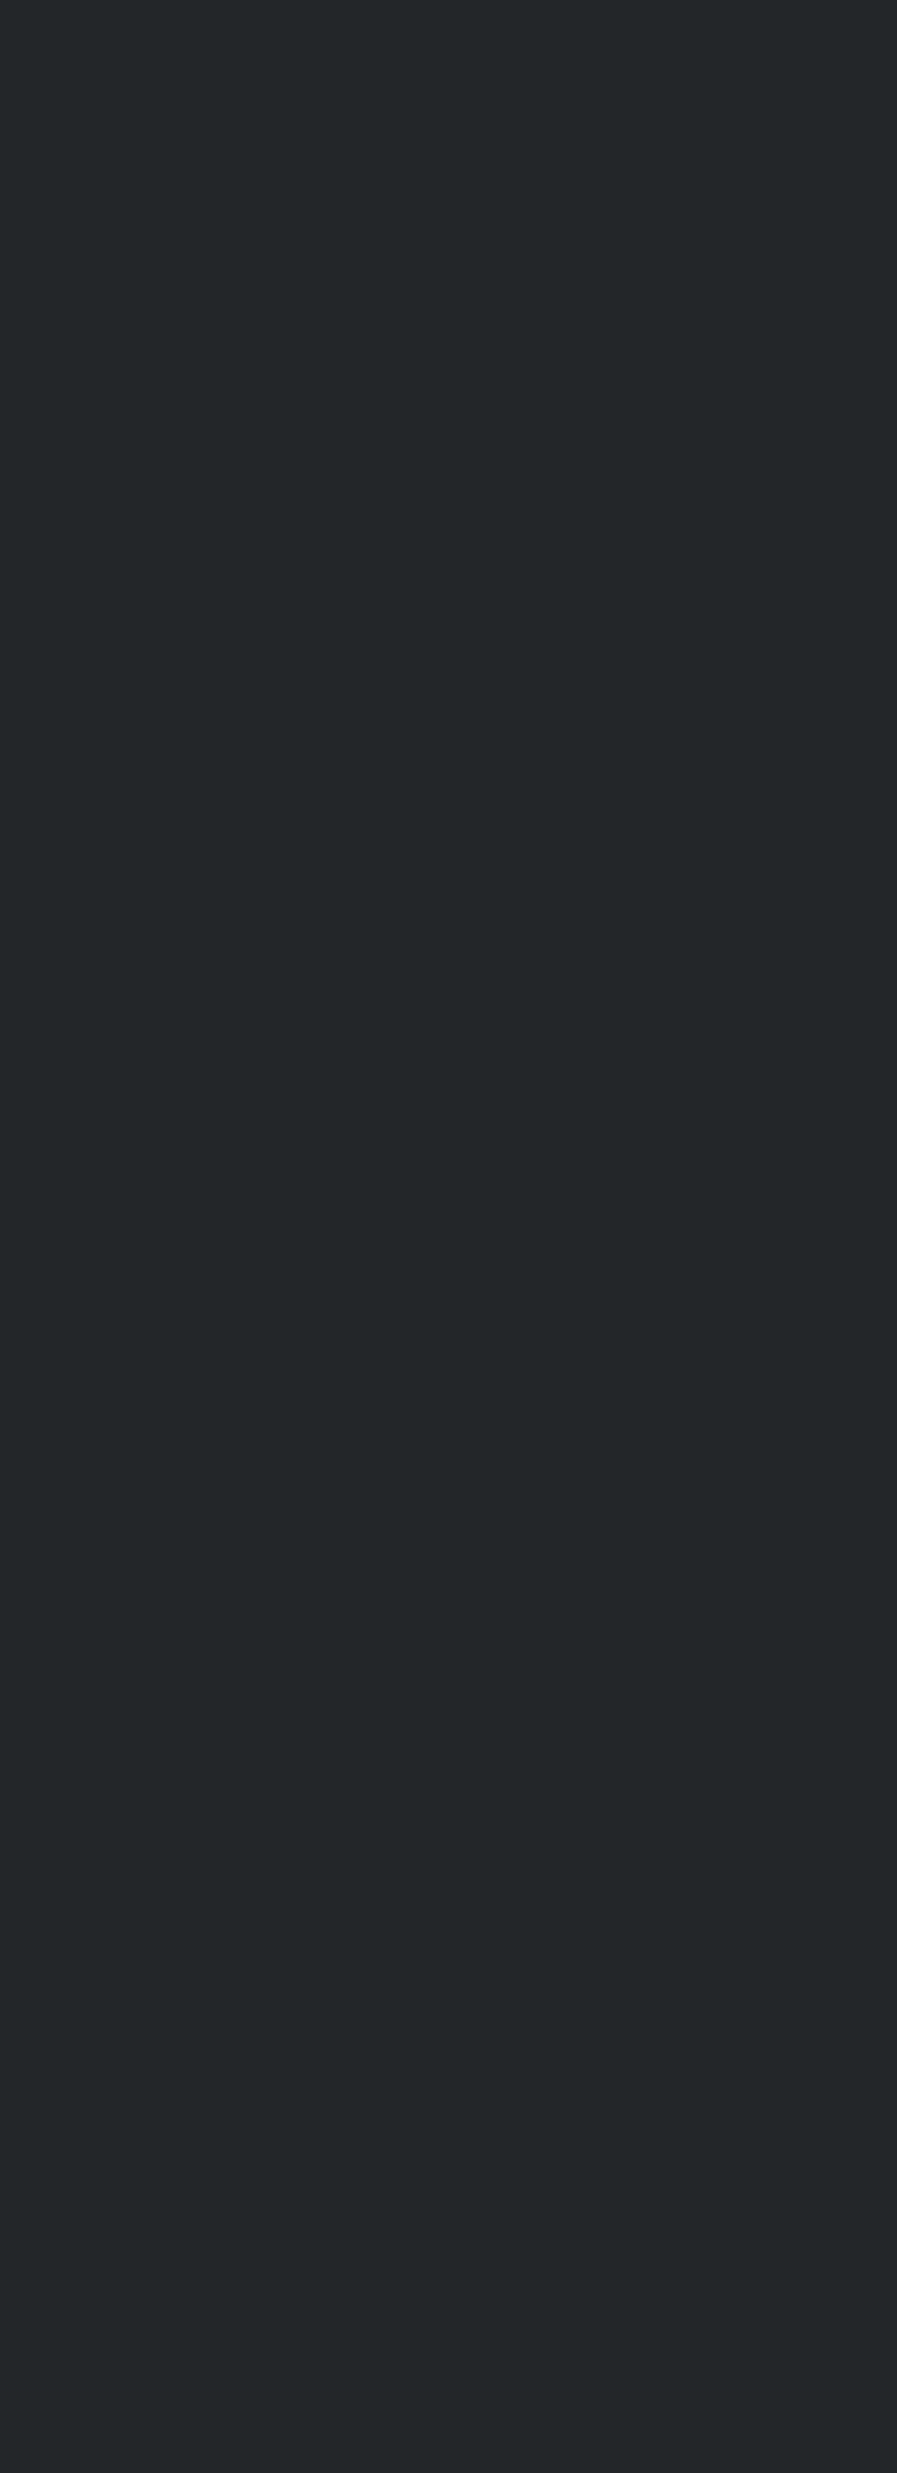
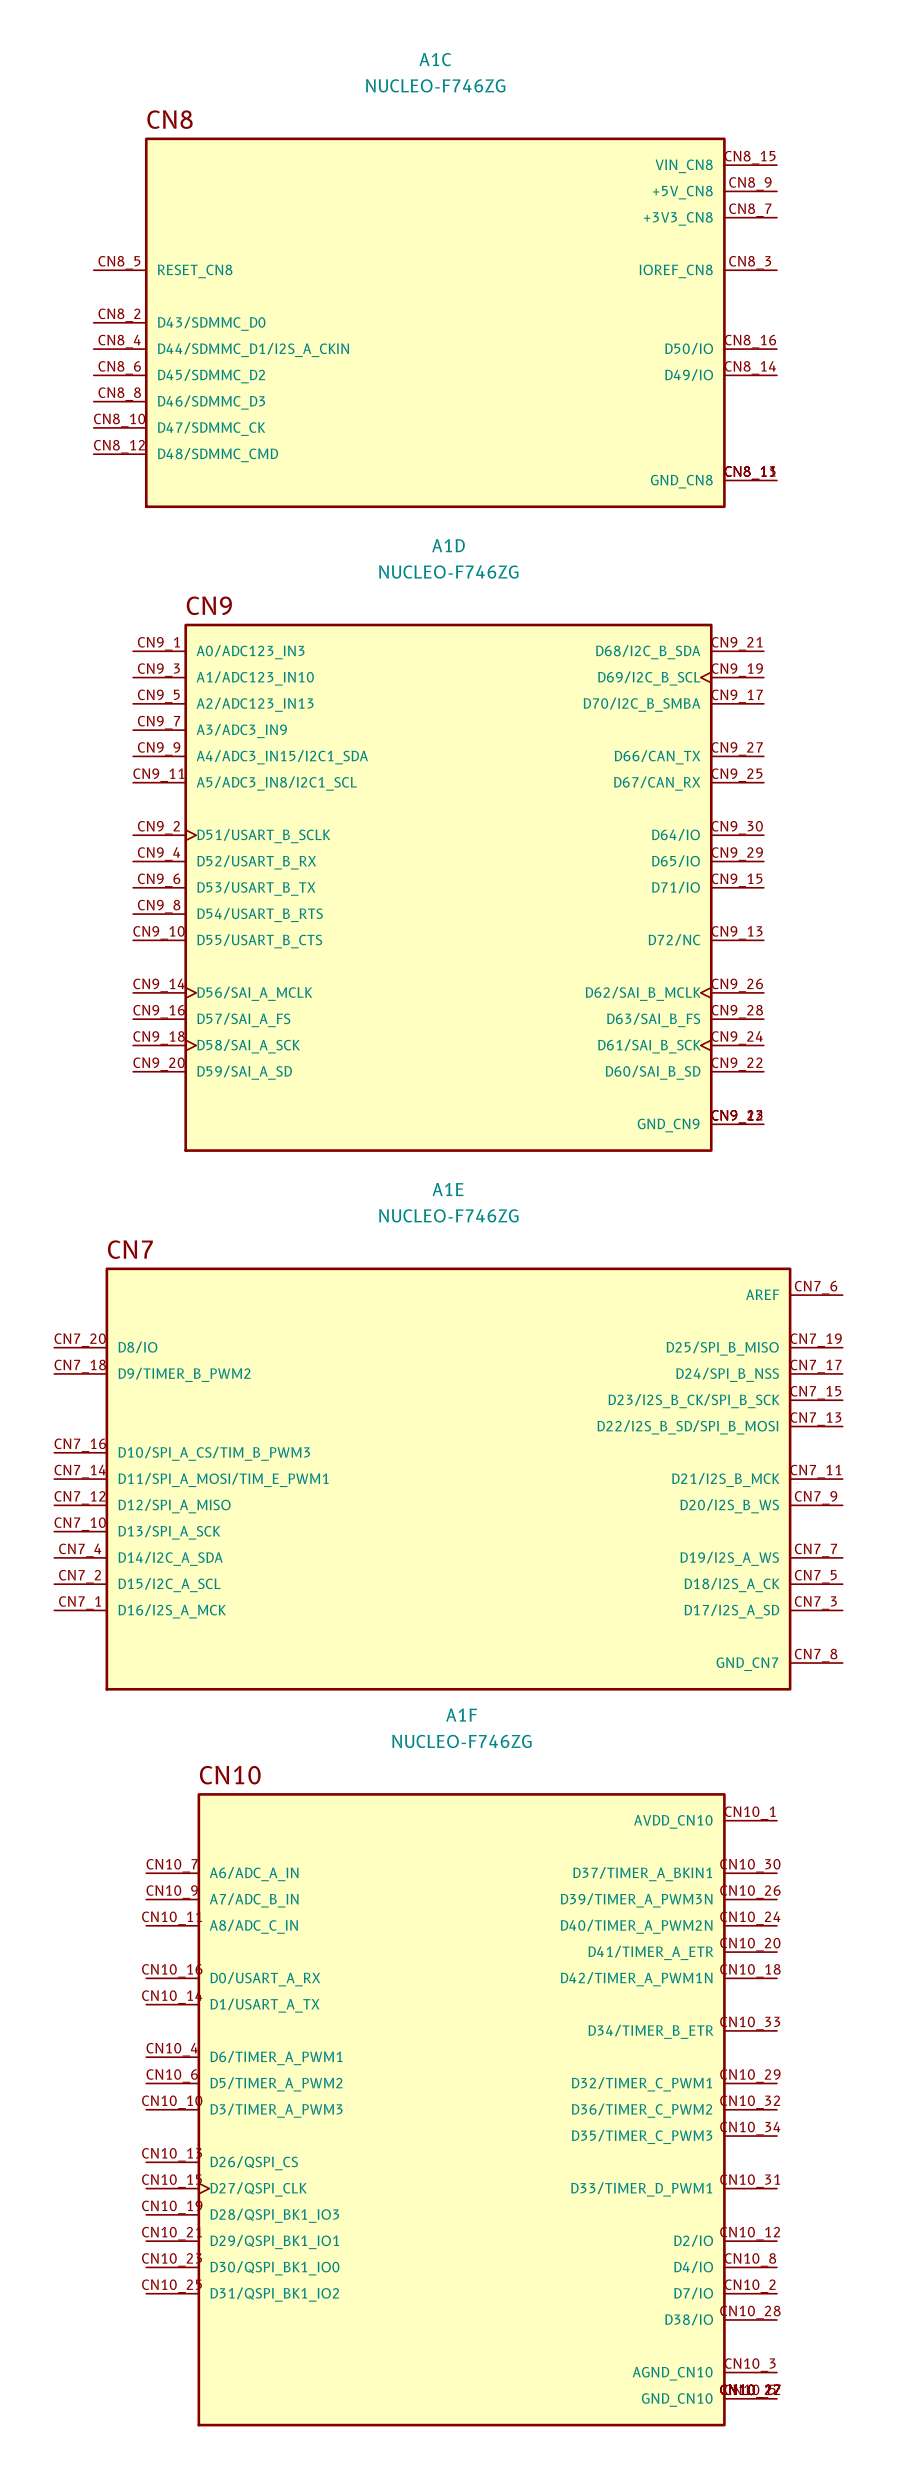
A1C: none -> NUCLEO-F746ZG (435, 322)
A1D: none -> NUCLEO-F746ZG (448, 887)
A1E: none -> NUCLEO-F746ZG (448, 1479)
A1F: none -> NUCLEO-F746ZG (461, 2109)

